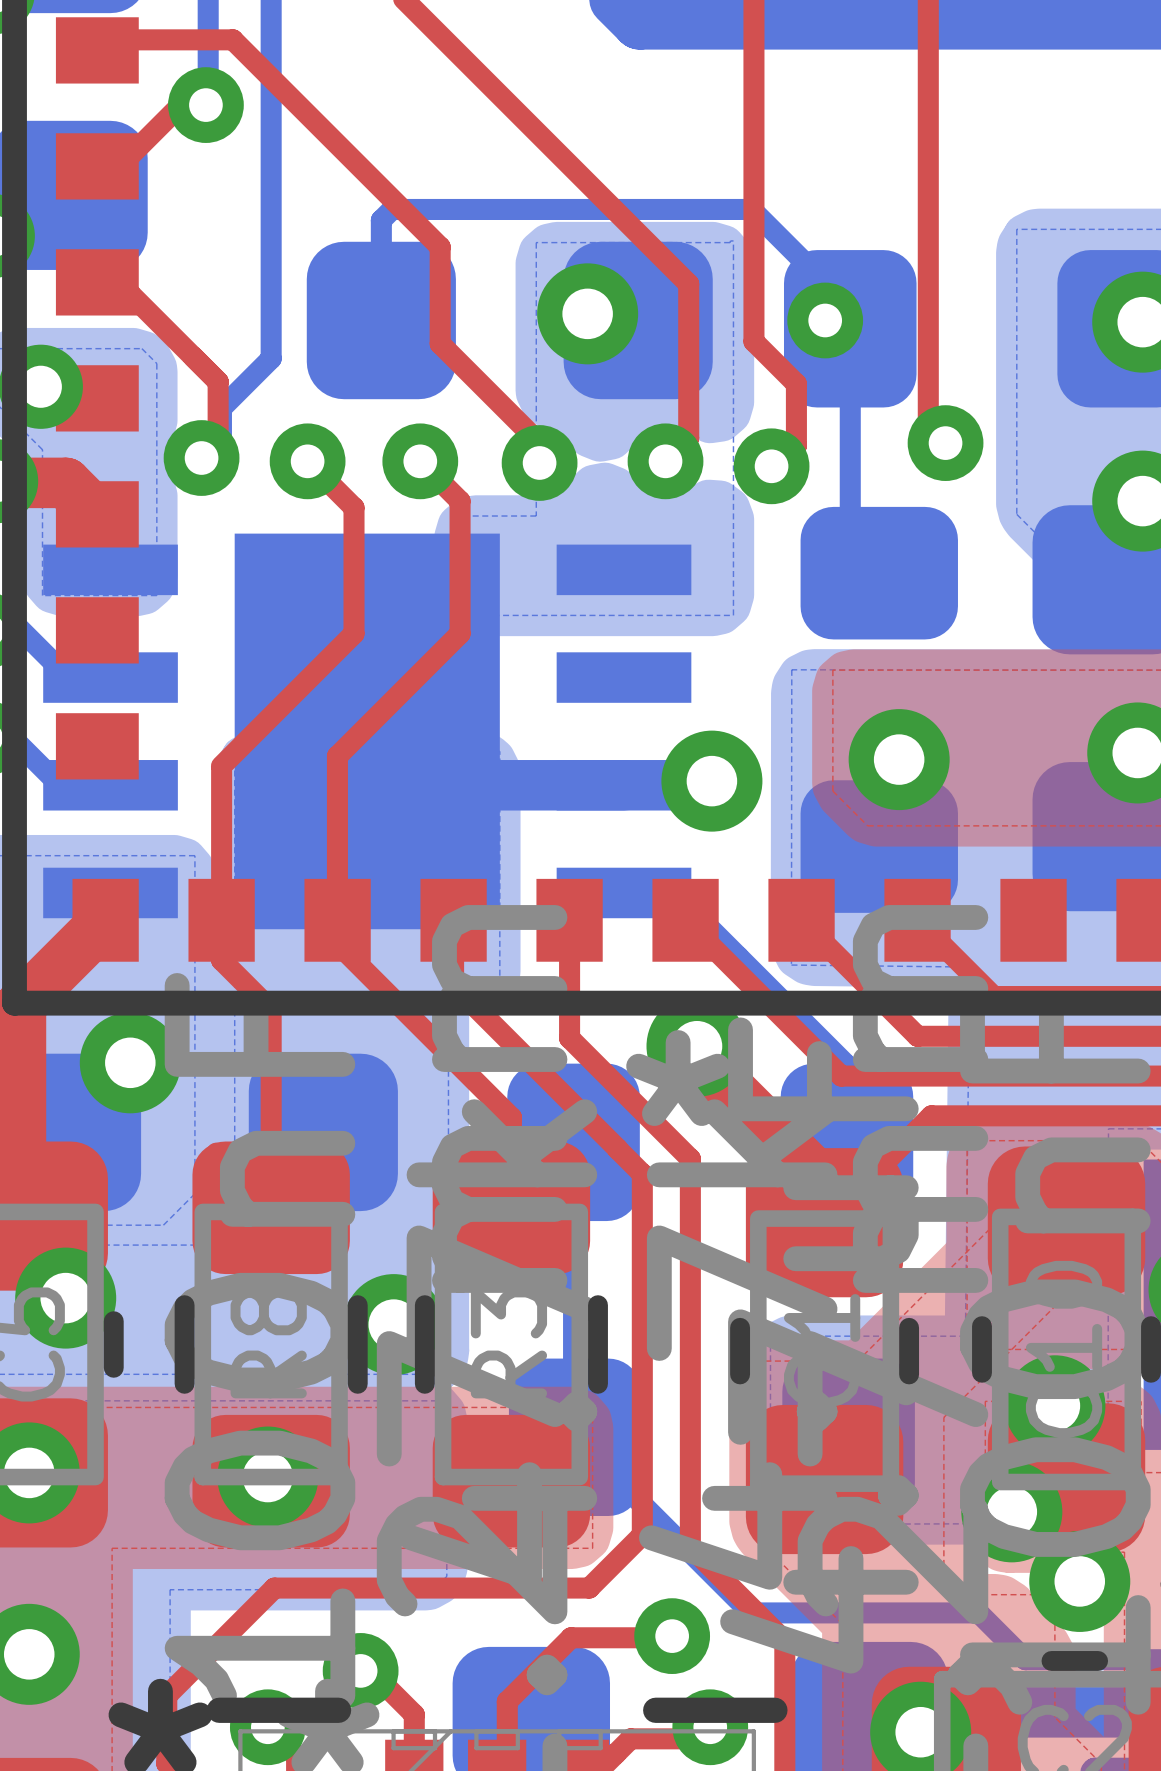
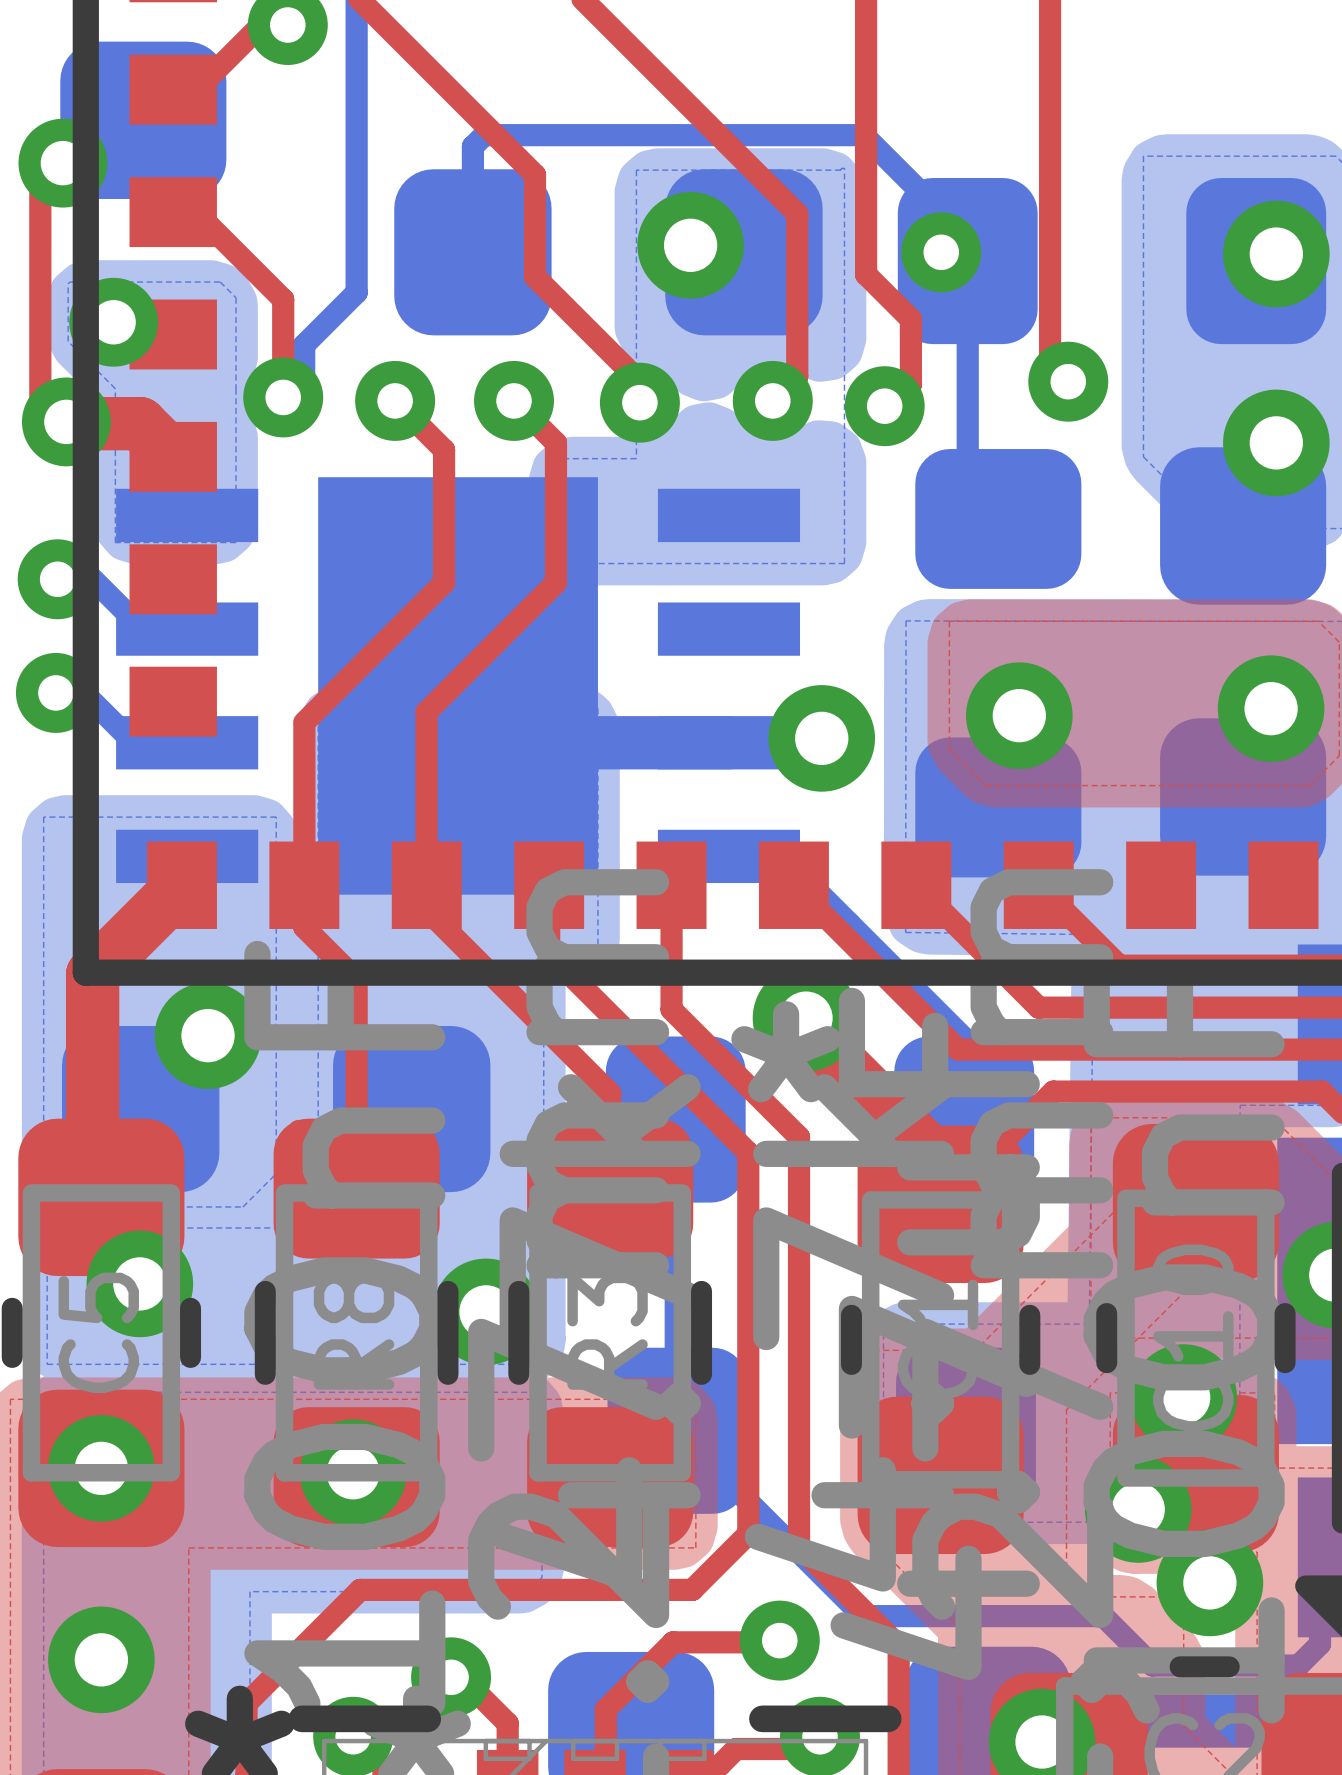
top track: (201, 365) (218, 381) (218, 467) -> (283, 299) (283, 397)

